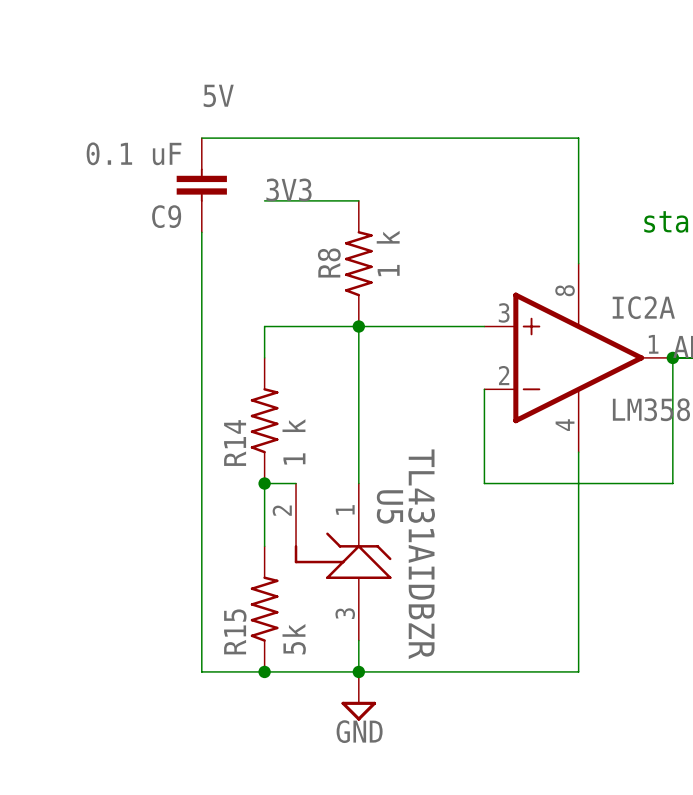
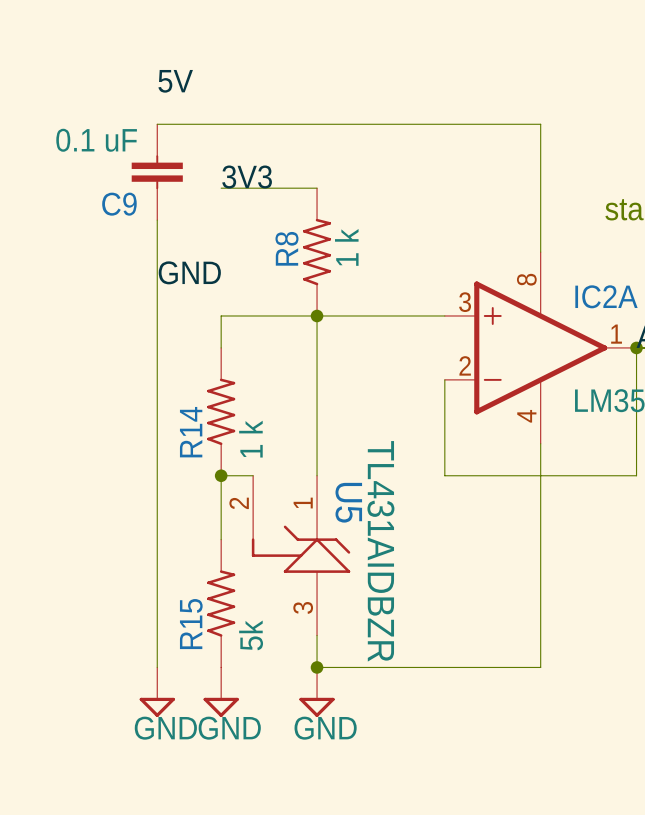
label: none -> GND (189, 272)
wire: (201, 671) (358, 671) -> none
junction: (264, 671) -> none
power symbol: none -> GND (157, 692)
power symbol: none -> GND (221, 692)

